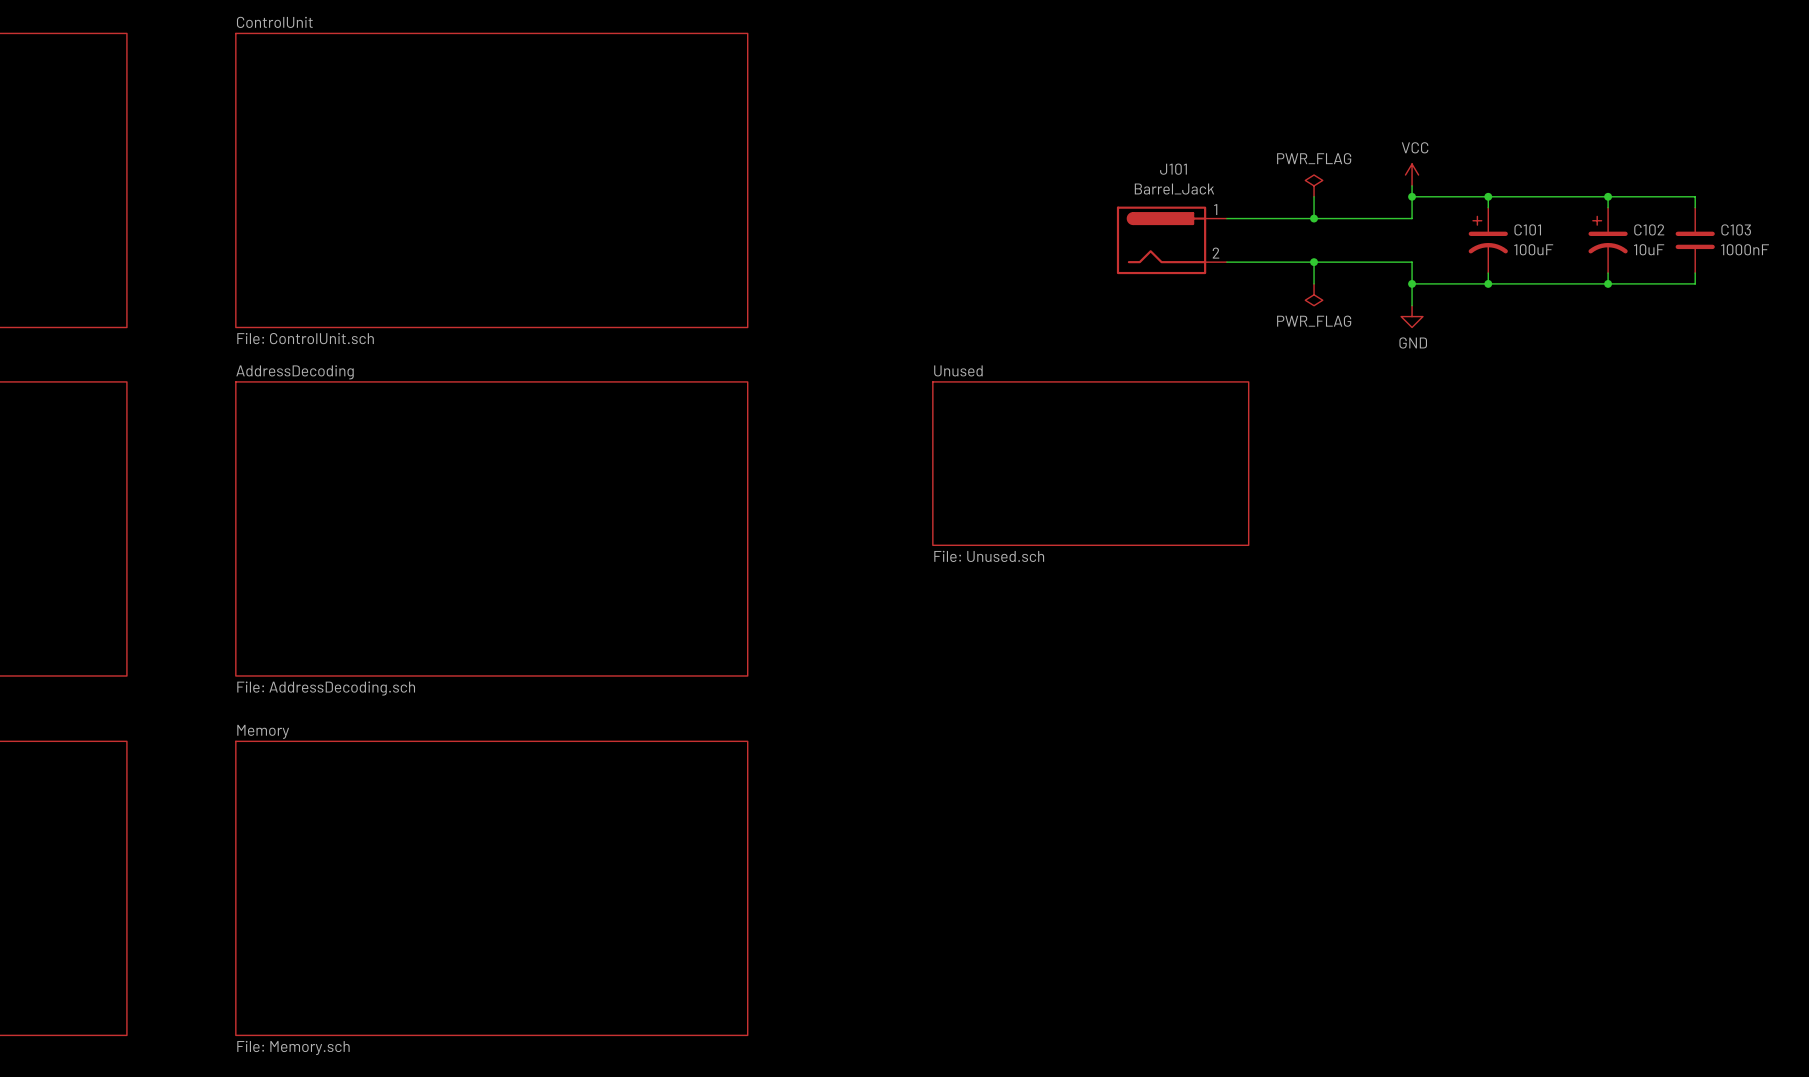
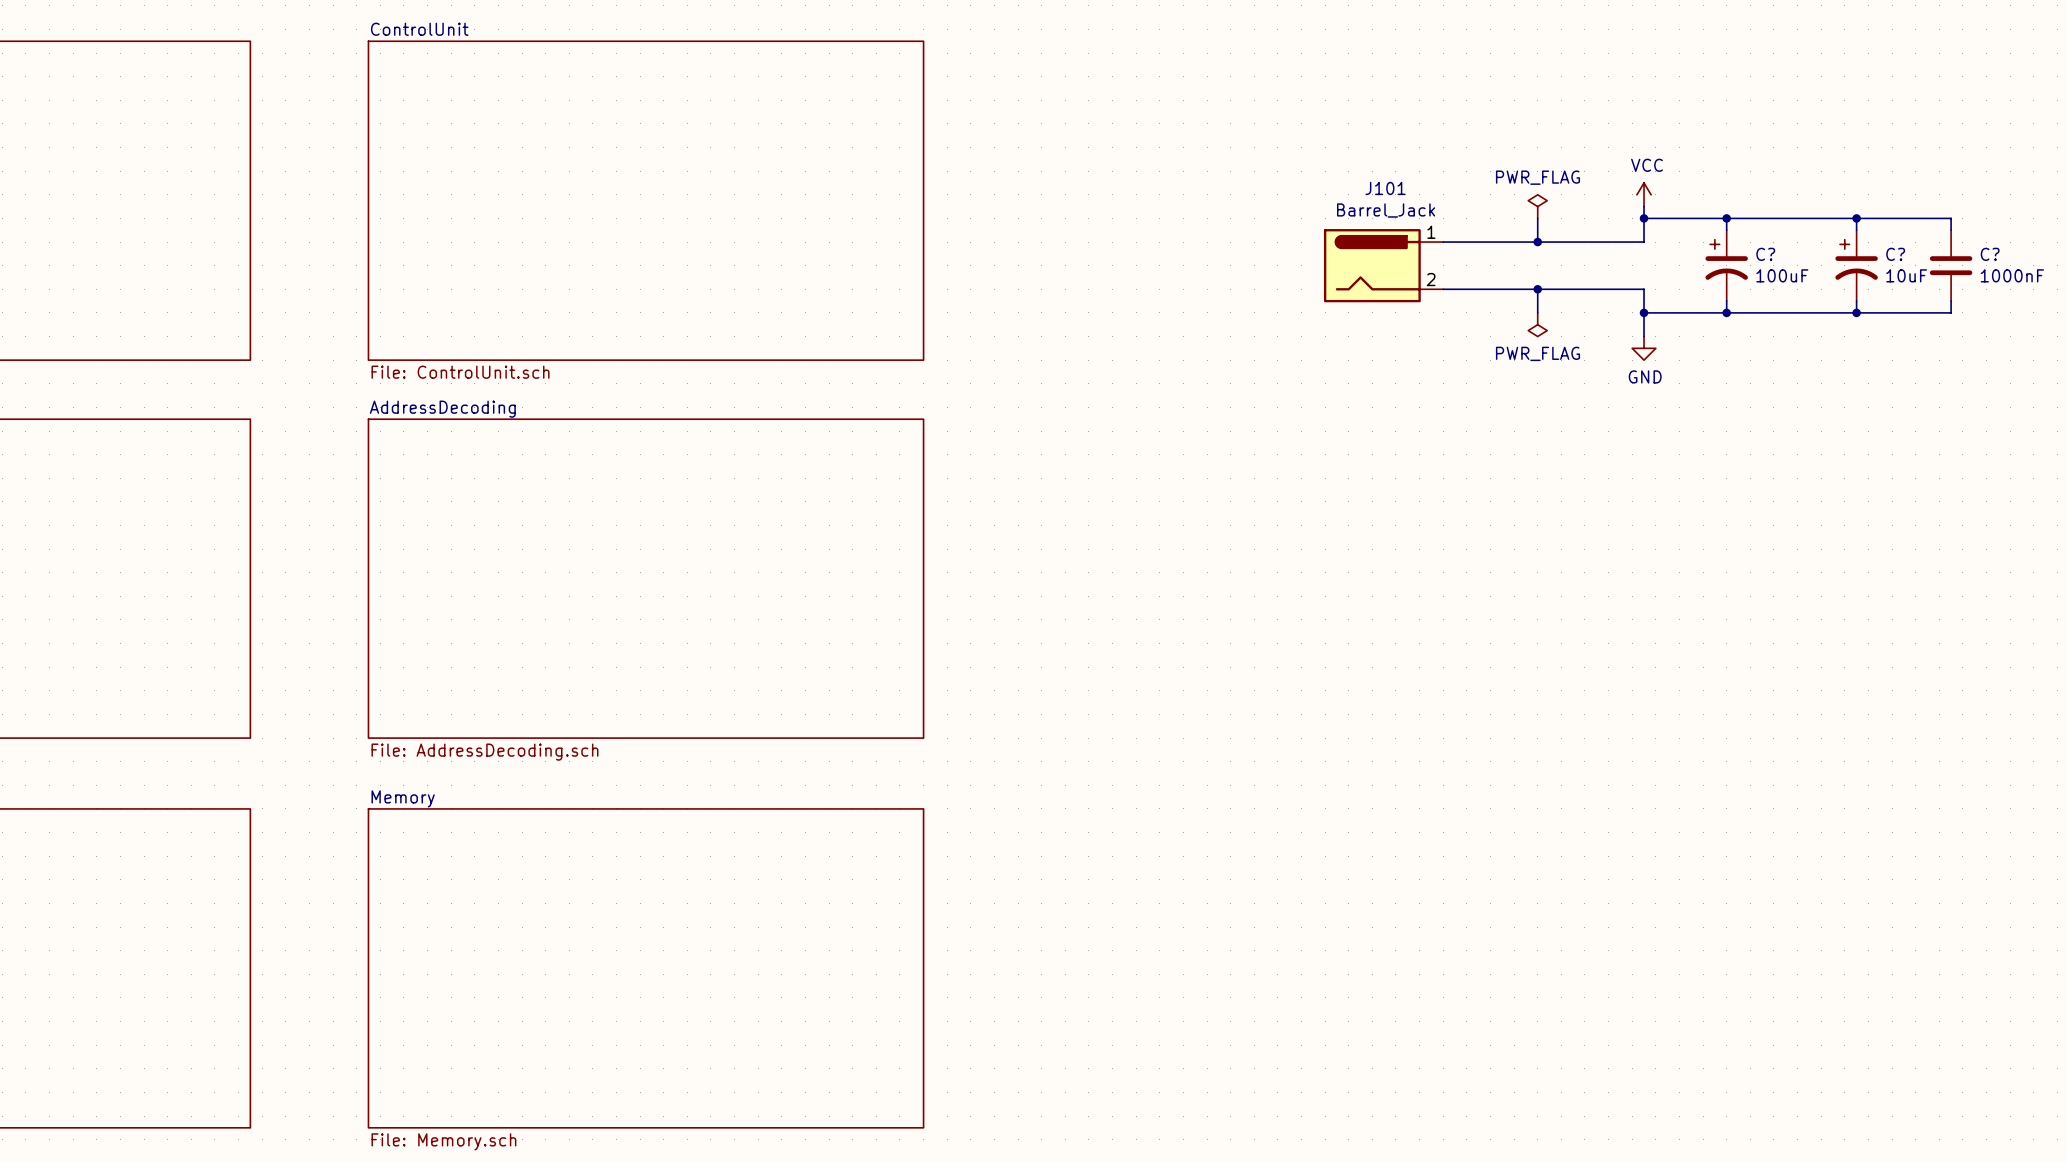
C101 name: C101 (1527, 229) -> C? (1765, 254)
C102 name: C102 (1649, 229) -> C? (1895, 254)
C103 name: C103 (1736, 229) -> C? (1990, 254)
sheet Unused: File: Unused.sch (1090, 463) -> none

